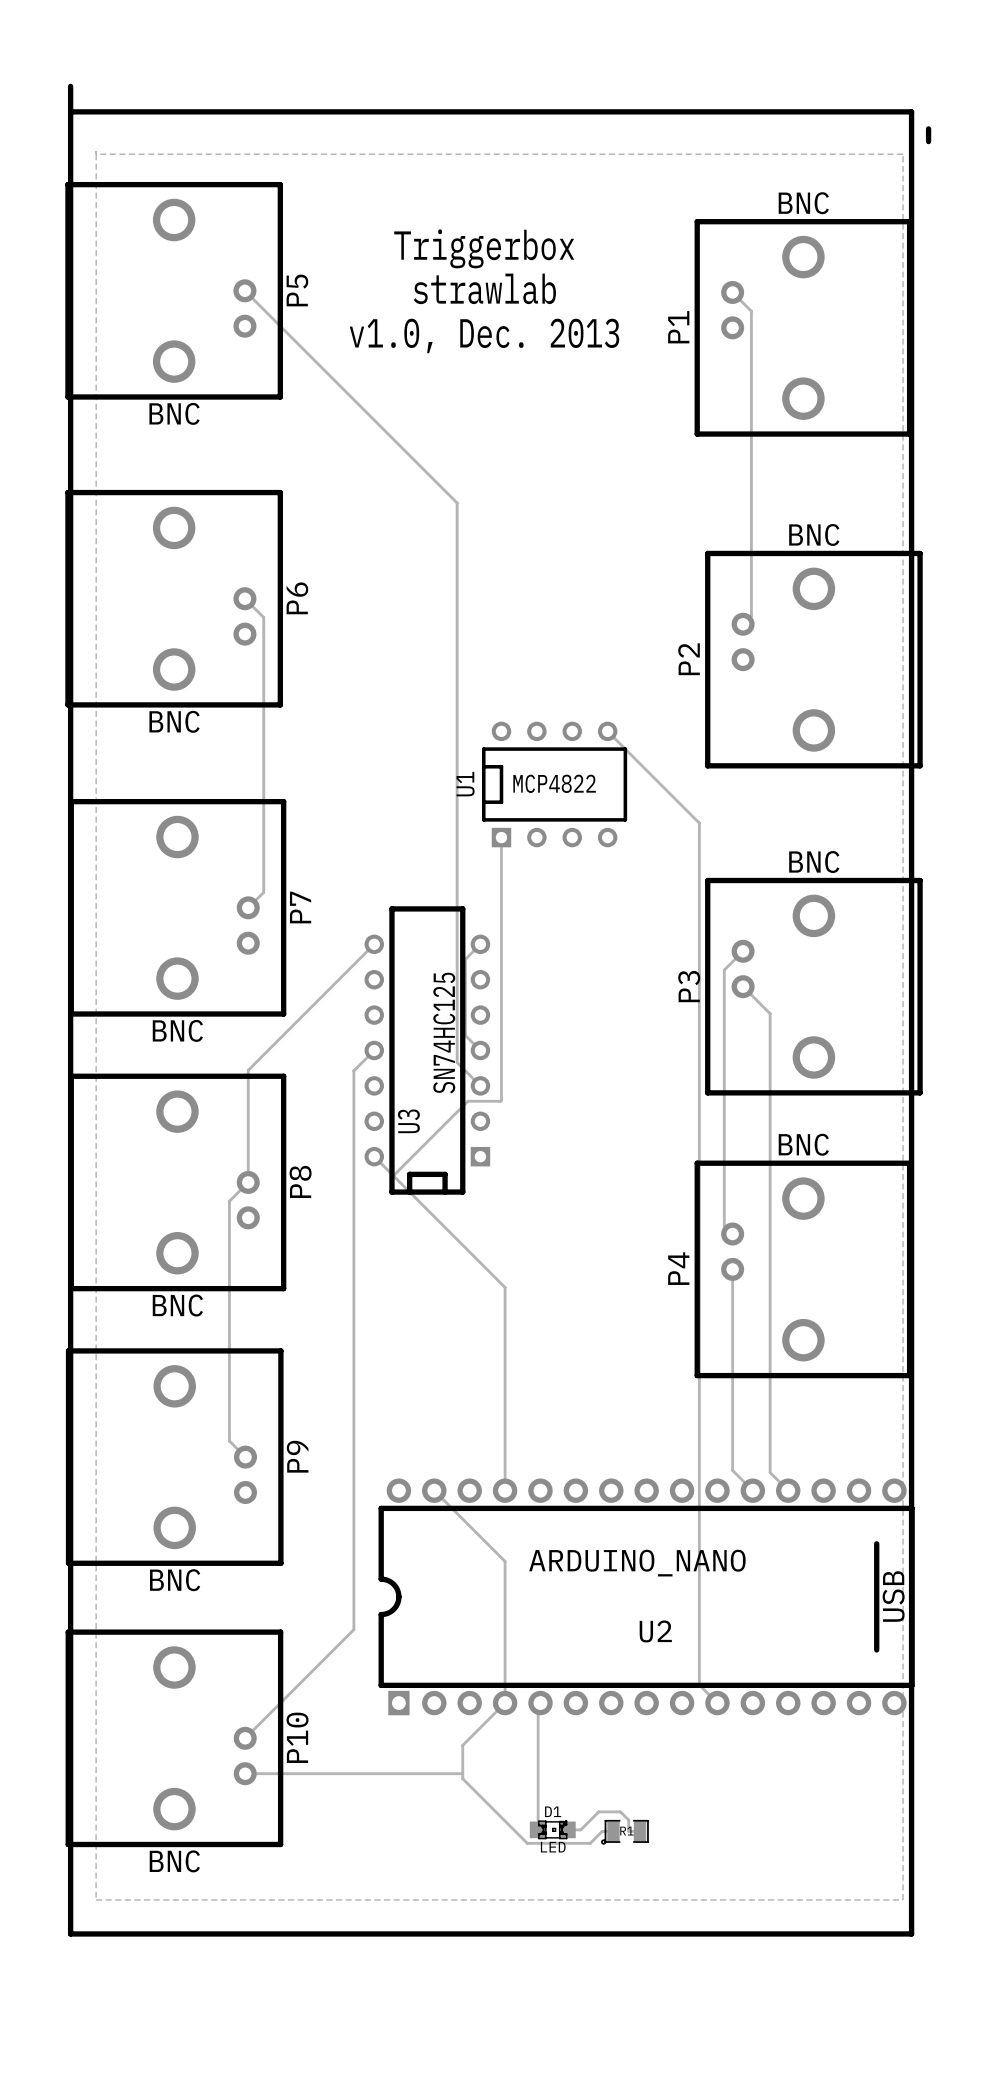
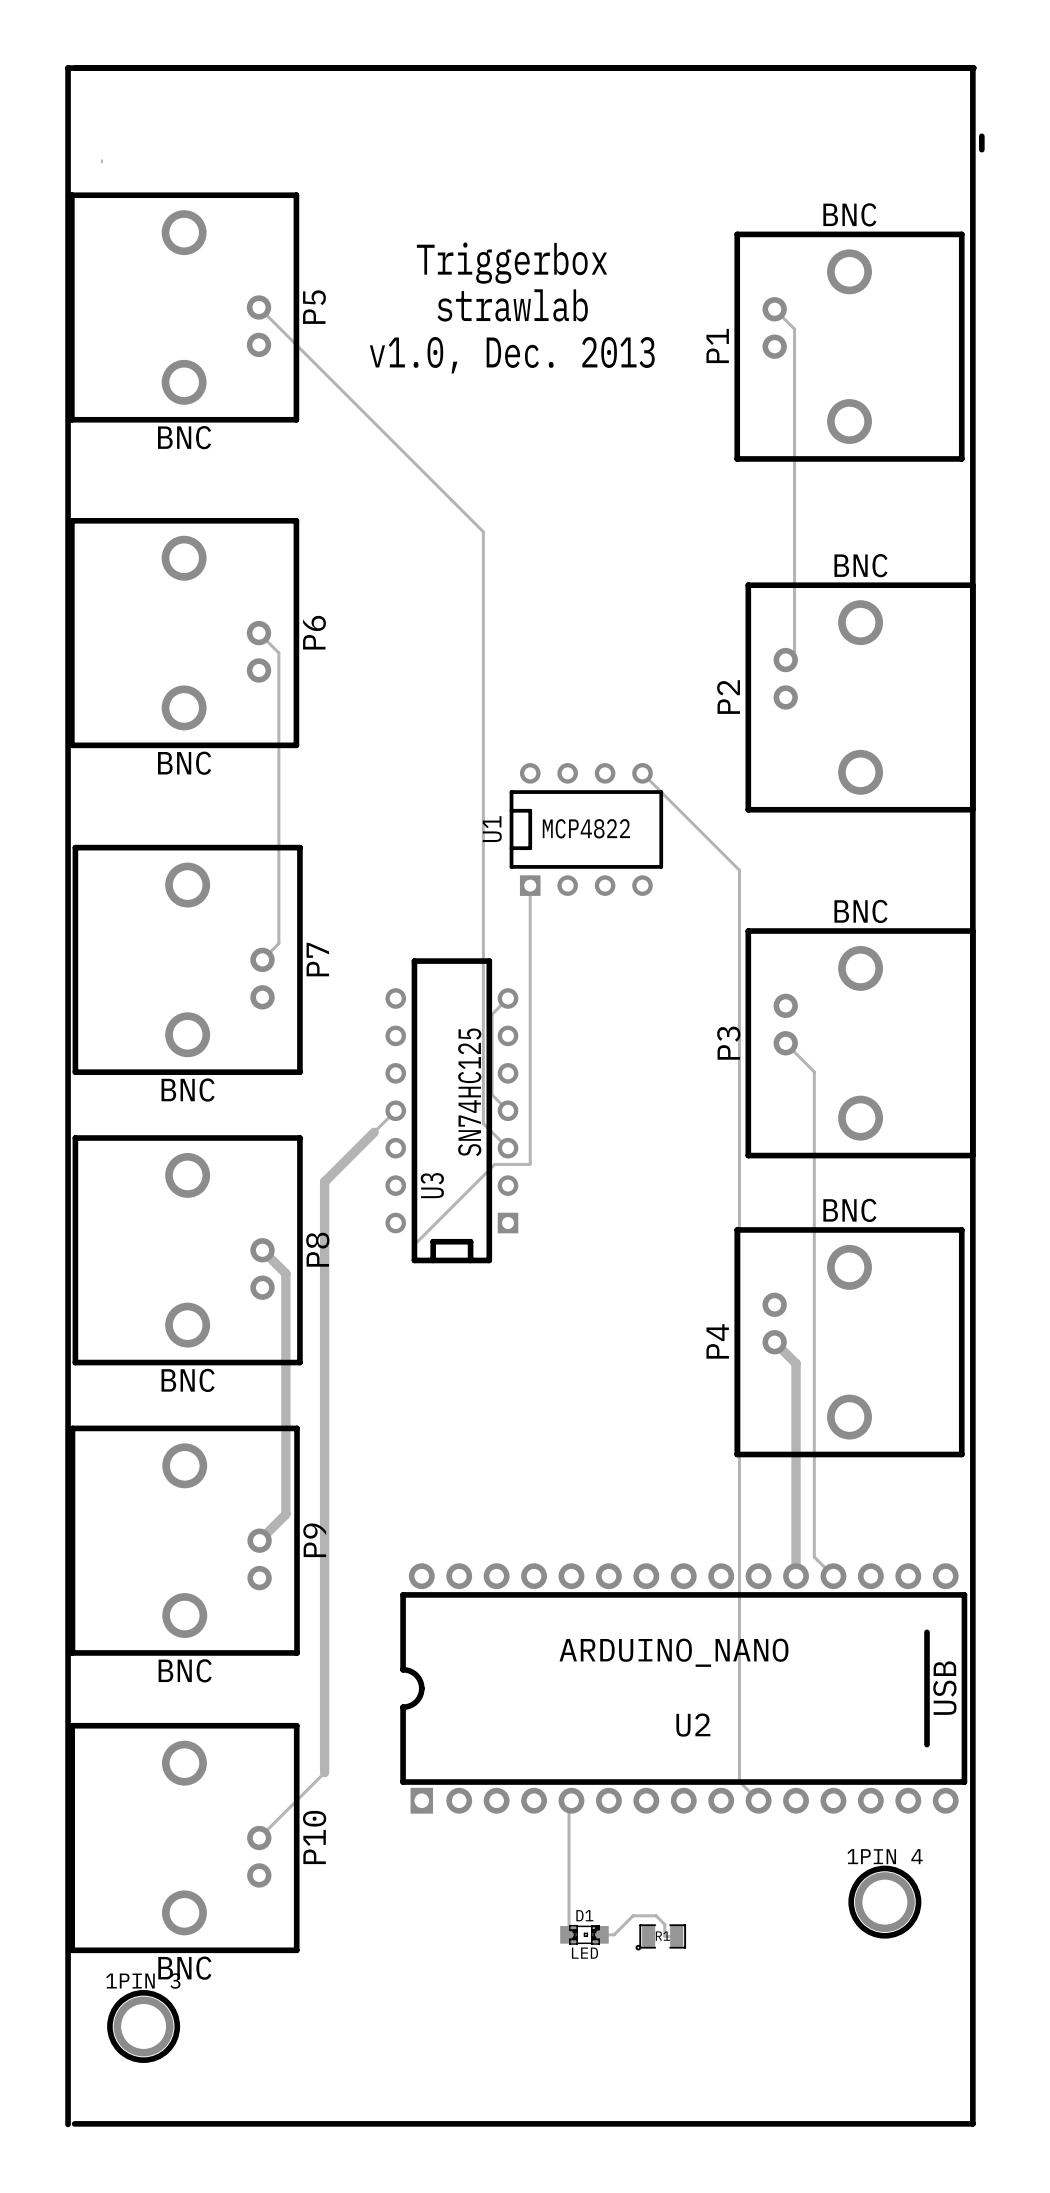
board edge: none -> (973, 68) (68, 68) (68, 2124)
board edge: none -> (972, 68) (972, 2123) (74, 2123)
board edge: (70, 86) (70, 1933) (911, 1933) (911, 111) (70, 111) -> none
zone outline: (96, 154) (903, 154) (903, 1899) (96, 1899) (96, 154) -> none
track: (374, 944) (248, 1070) (248, 1182) (229, 1201) (229, 1441) (245, 1457) -> (262, 1250) (285, 1273) (285, 1514) (259, 1540)
track: (743, 951) (724, 970) (724, 1225) (732, 1234) -> none
track: (353, 1070) (353, 1629) (307, 1676) -> (374, 1132) (324, 1181) (324, 1772)
track: (374, 1156) (505, 1287) (505, 1490) -> none
track: (732, 1269) (732, 1470) (752, 1490) -> (774, 1342) (796, 1363) (796, 1576)
track: (434, 1490) (505, 1561) (505, 1703) (462, 1745) (462, 1778) (527, 1843) (590, 1843) (602, 1831) (613, 1831) -> none
track: (245, 1773) (462, 1773) -> none
1PIN 4: none -> (884, 1902)
1PIN 3: none -> (143, 2026)

